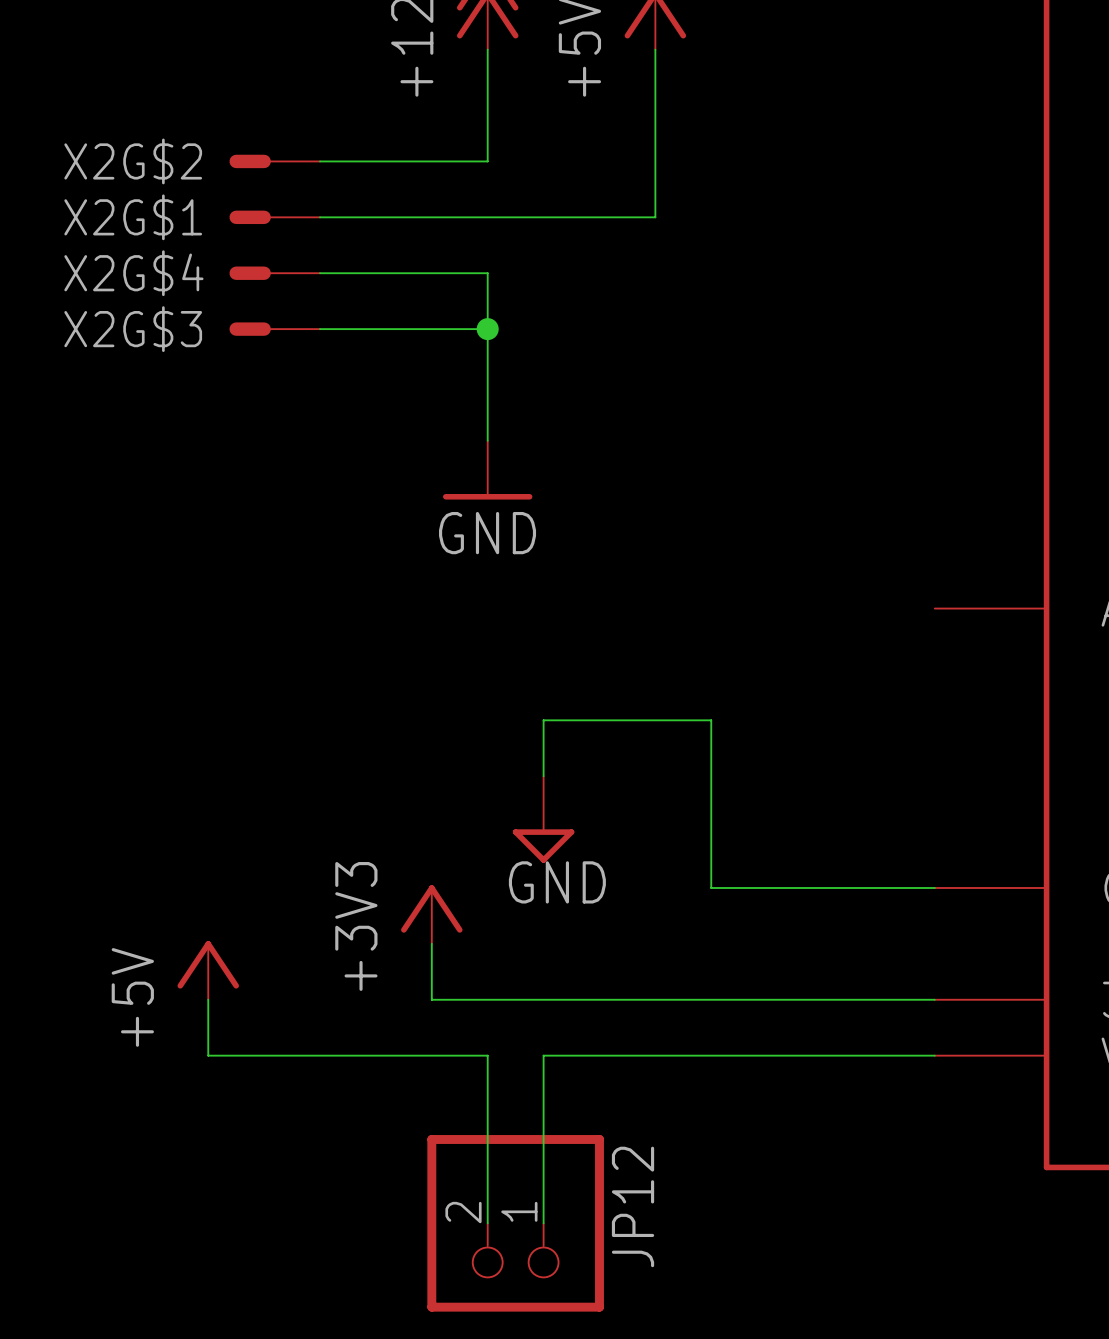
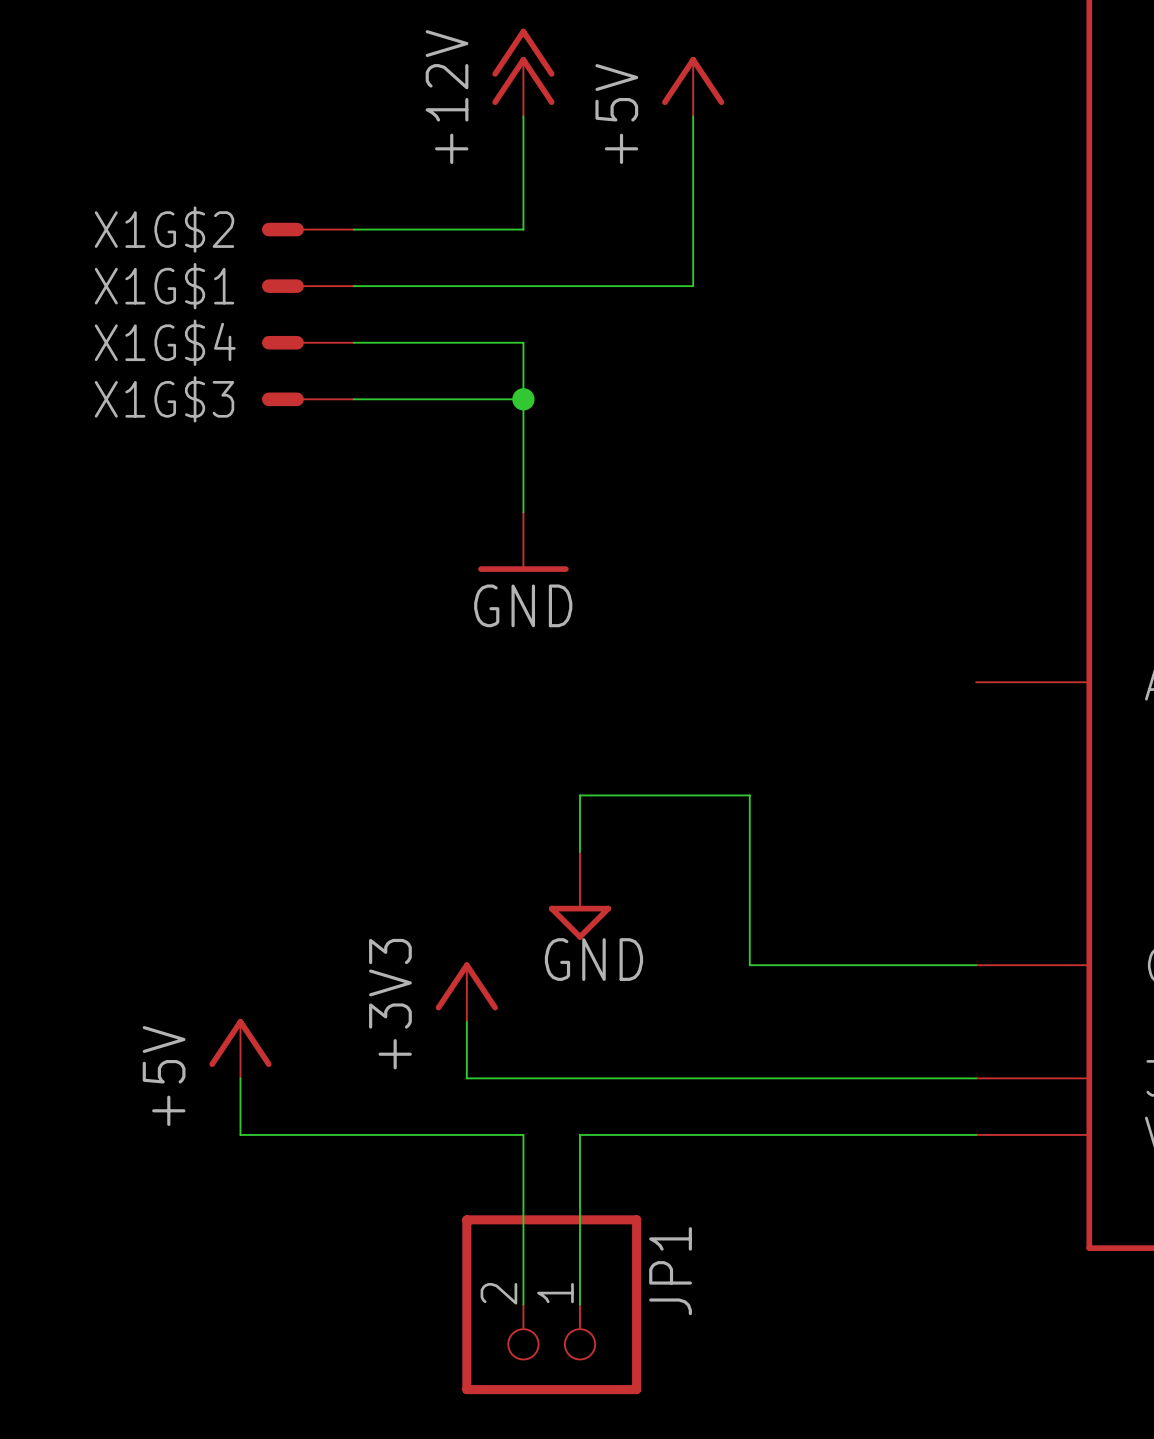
X2G$2 name: X2G$2 (133, 161) -> X1G$2 (164, 229)
X2G$1 name: X2G$1 (133, 217) -> X1G$1 (164, 286)
X2G$4 name: X2G$4 (133, 273) -> X1G$4 (165, 342)
X2G$3 name: X2G$3 (133, 329) -> X1G$3 (164, 399)
JP12 name: JP12 (633, 1206) -> JP1 (670, 1271)

